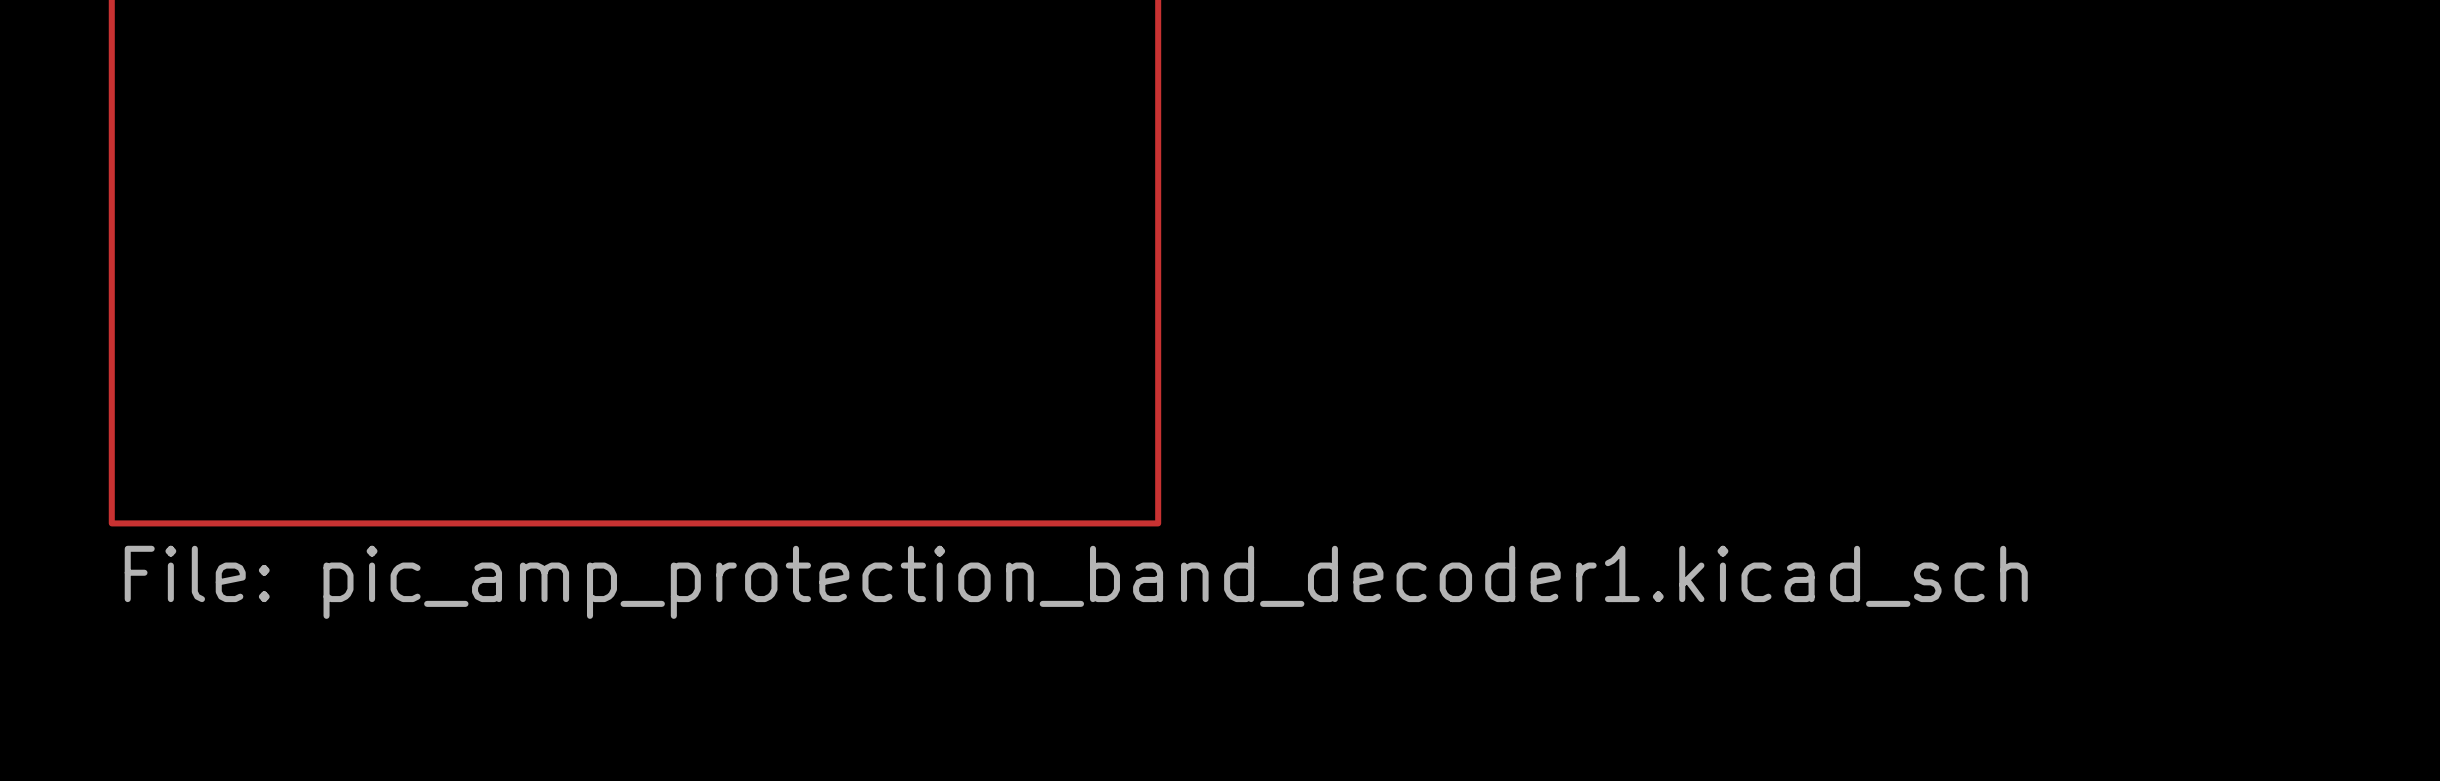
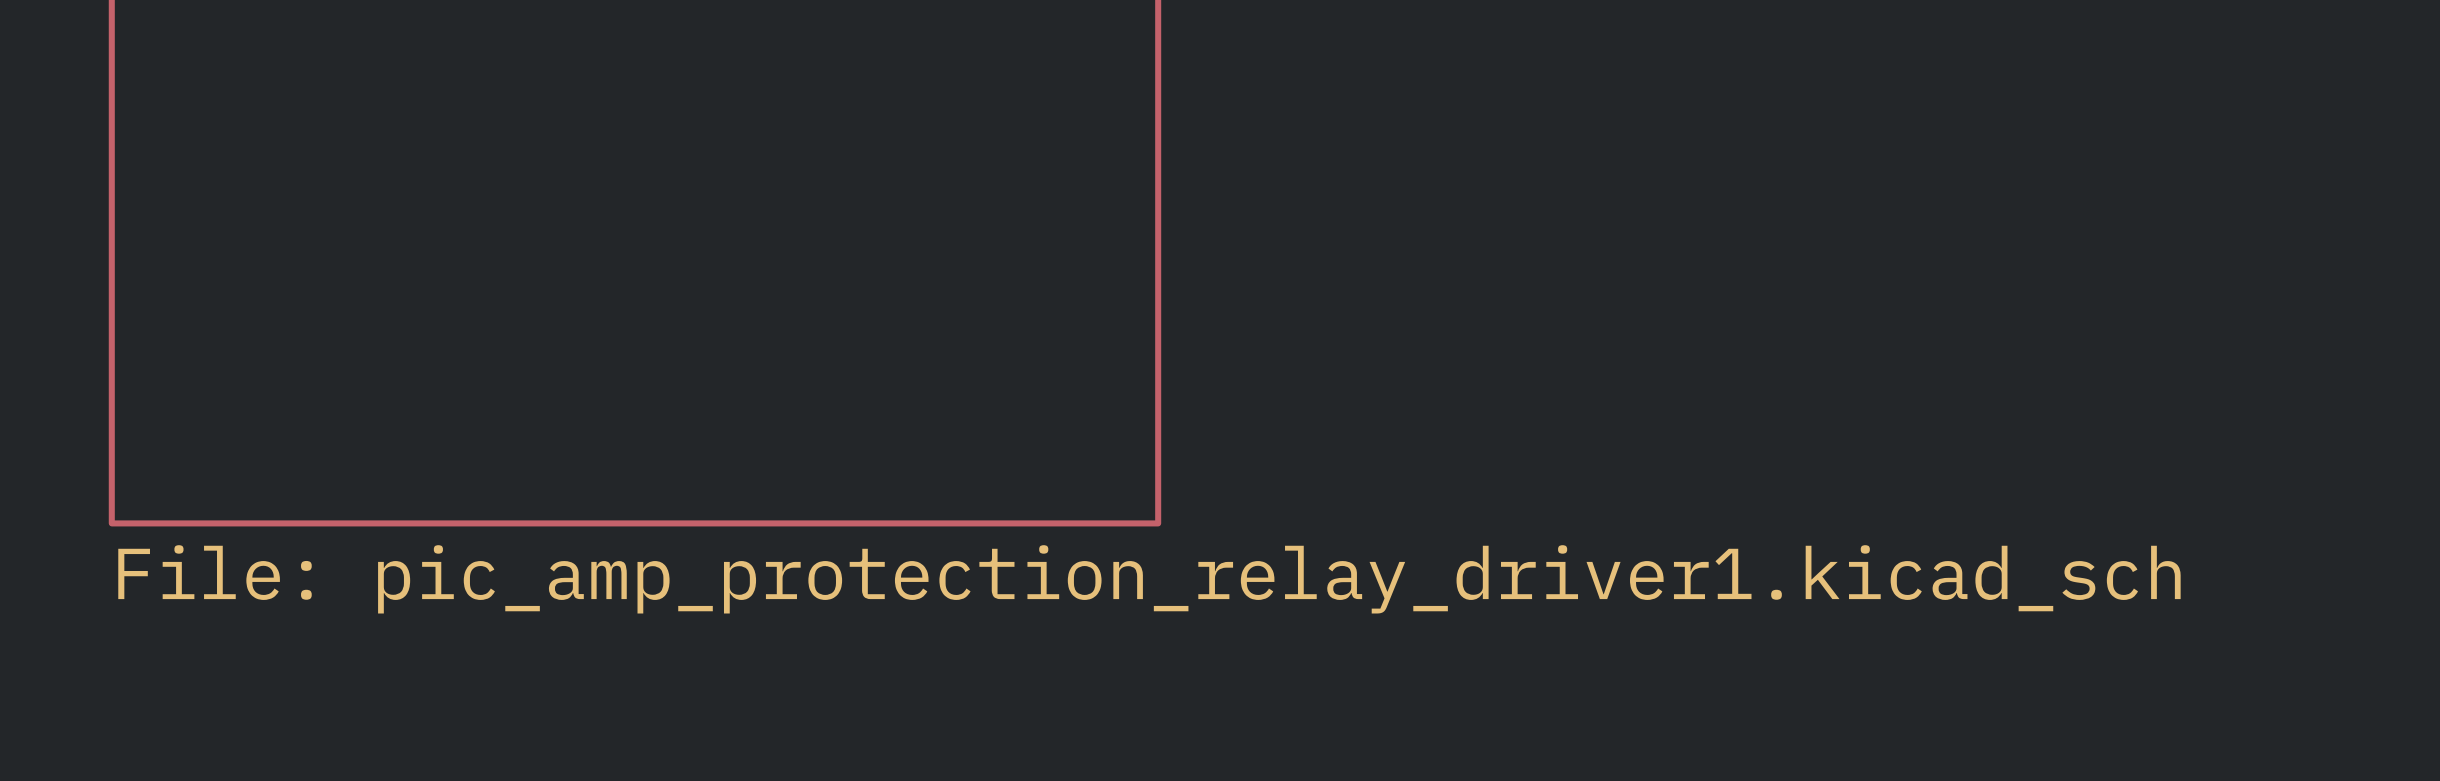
sheet value: File: pic_amp_protection_band_decoder1.kicad_sch (1076, 582) -> File: pic_amp_protection_relay_driver1.kicad_sch (1149, 579)

